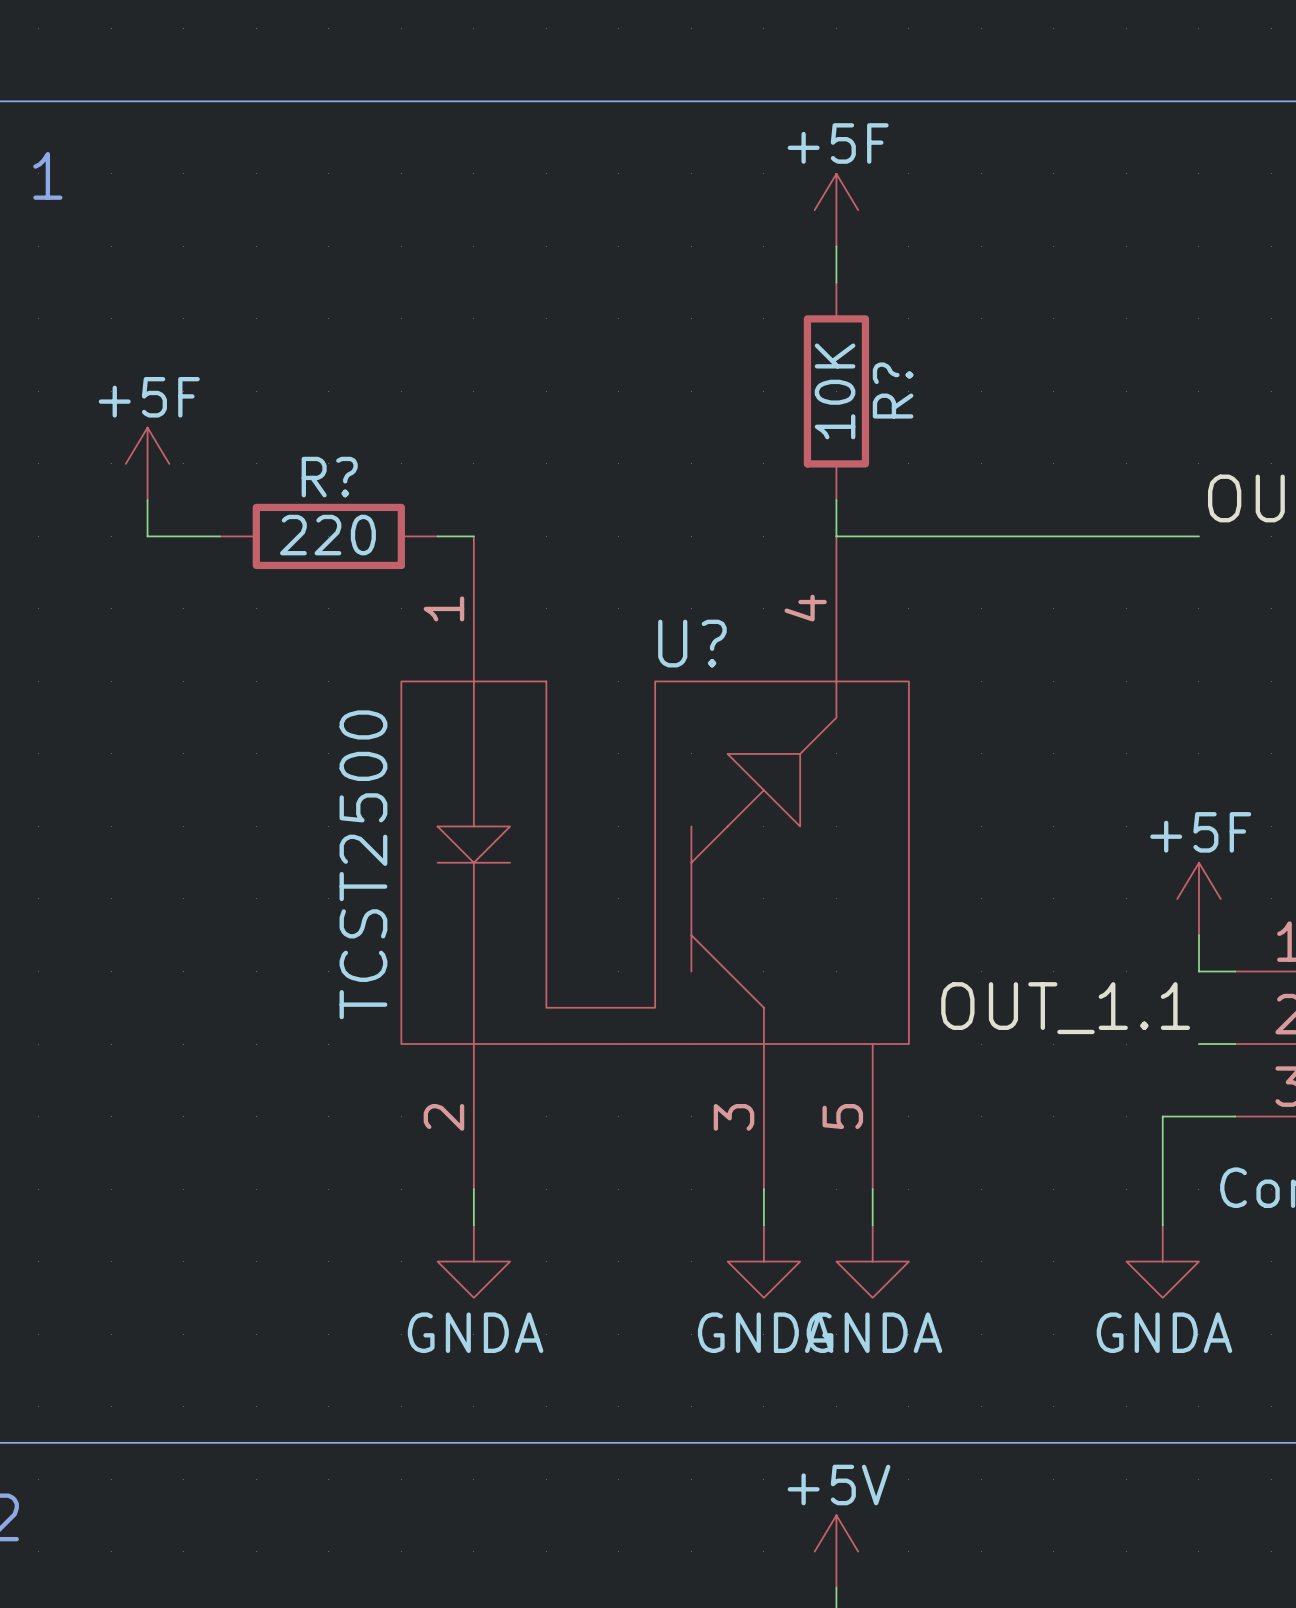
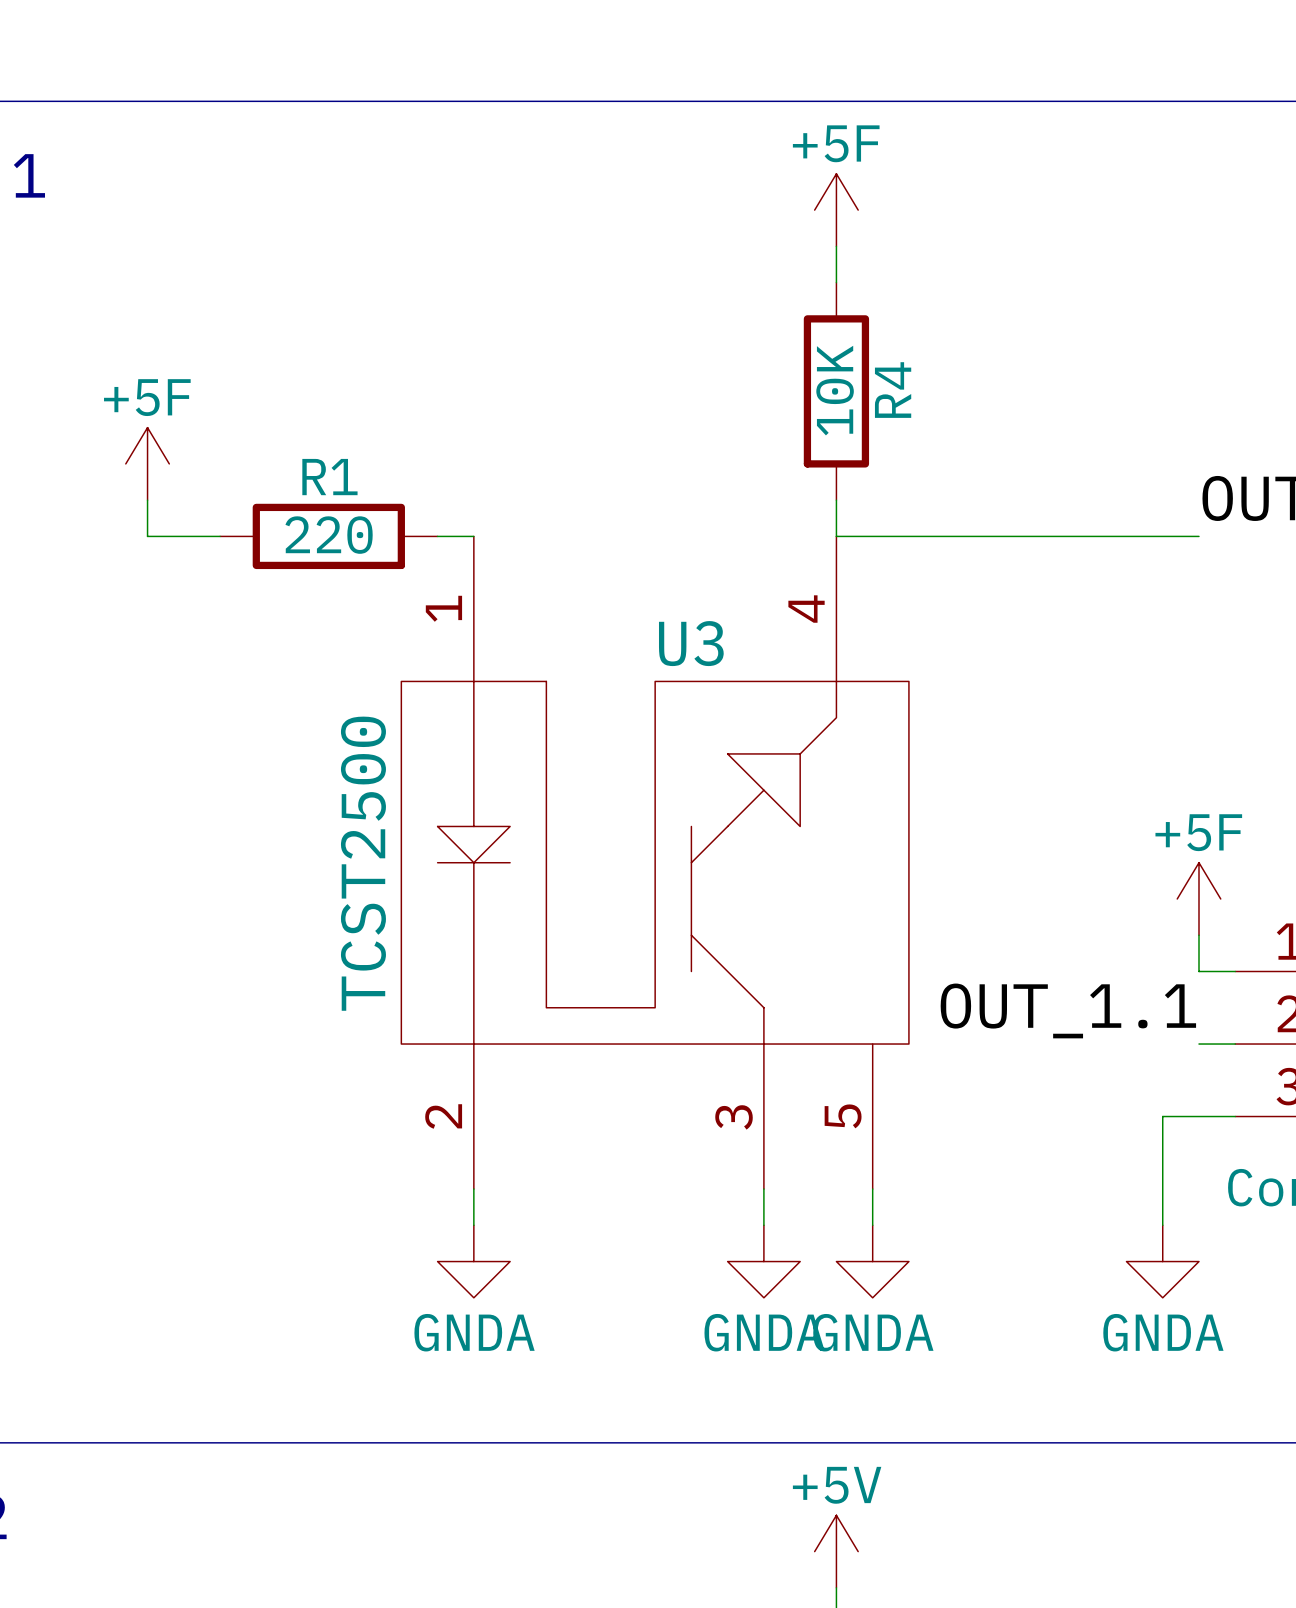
R? name: R? (893, 390) -> R4 (893, 390)
R? name: R? (329, 477) -> R1 (329, 477)
U? name: U? (692, 643) -> U3 (691, 643)

